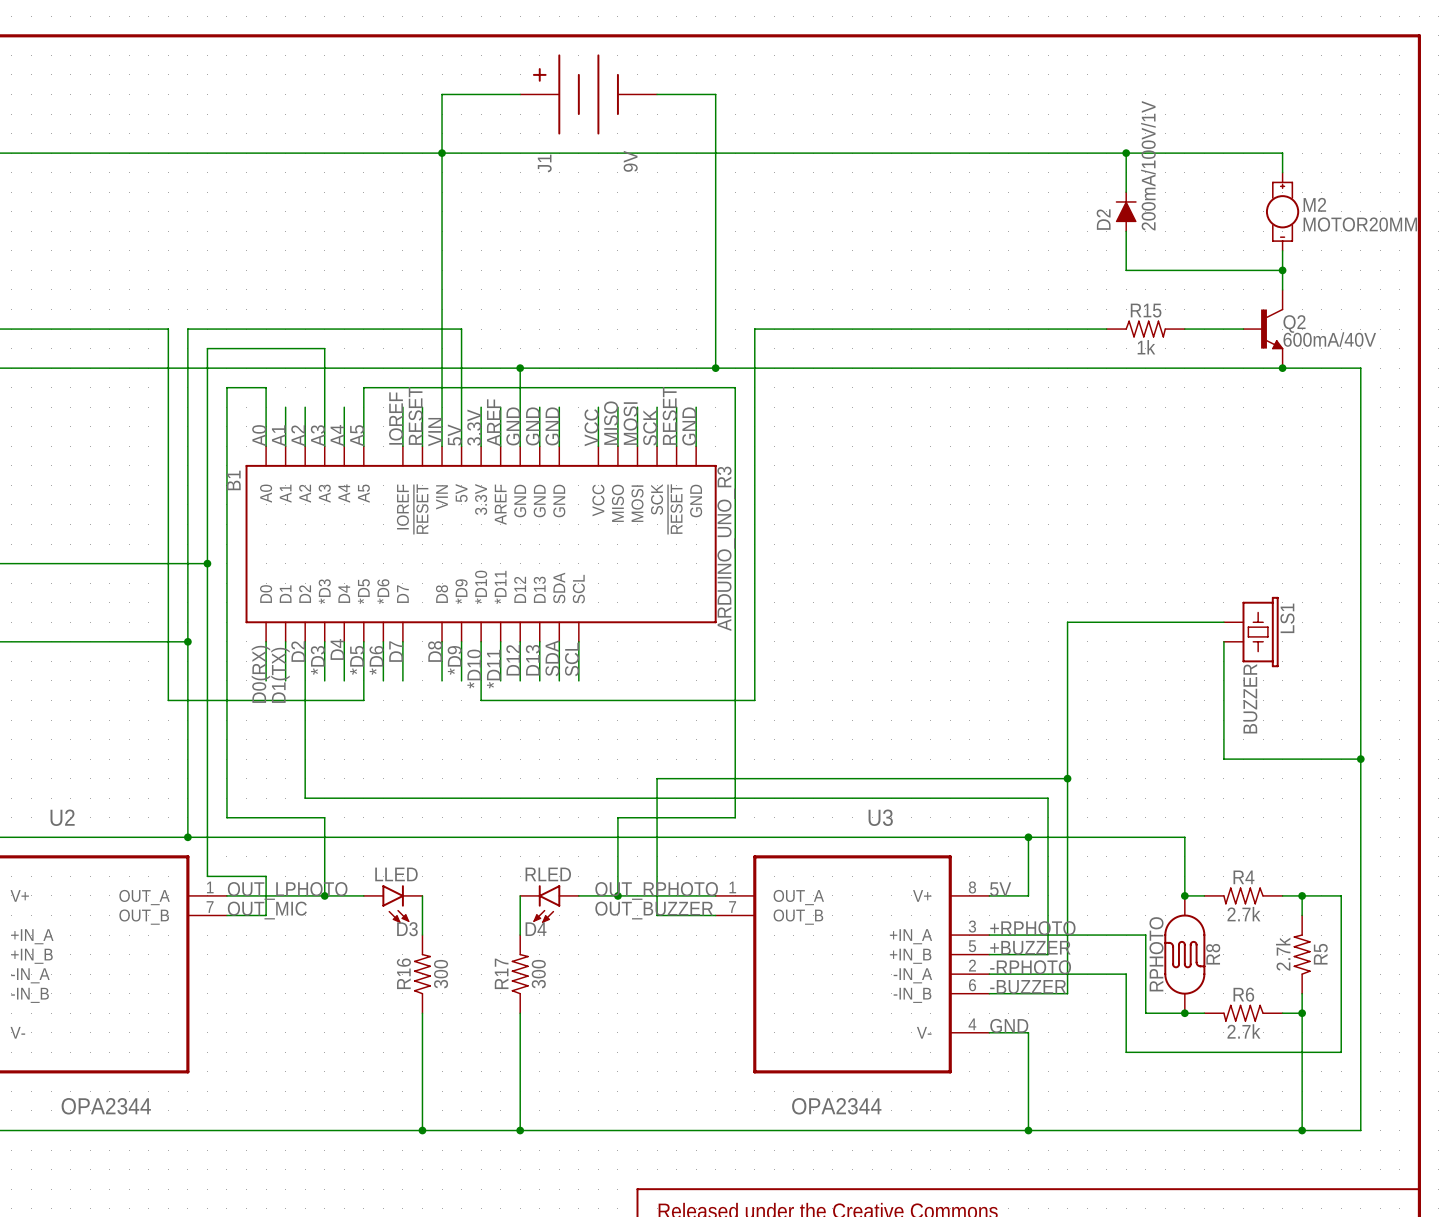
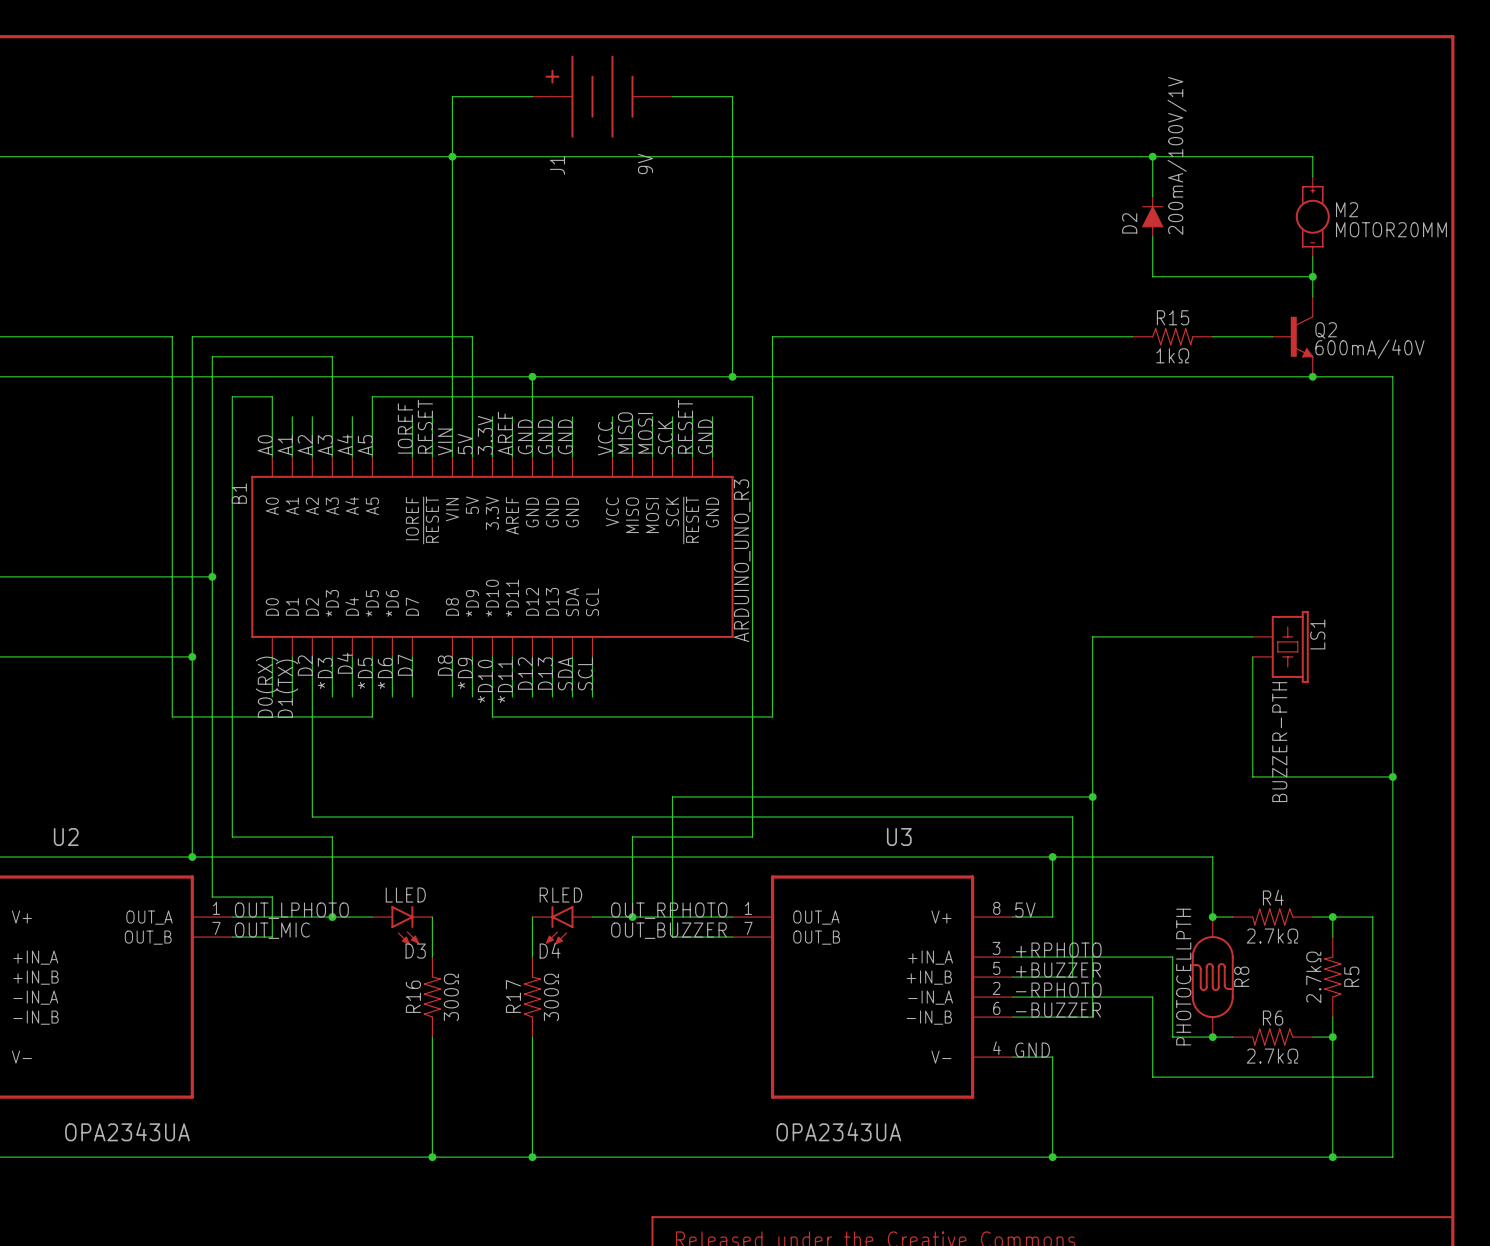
R15 value: 1k (1146, 347) -> 1kΩ (1172, 355)
LS1 value: BUZZER (1250, 698) -> BUZZER-PTH (1279, 742)
R4 value: 2.7k (1243, 914) -> 2.7kΩ (1272, 936)
R8 value: RPHOTO (1156, 954) -> PHOTOCELLPTH (1183, 977)
R5 value: 2.7k (1283, 954) -> 2.7kΩ (1313, 977)
R16 value: 300 (441, 974) -> 300Ω (451, 997)
R17 value: 300 (538, 974) -> 300Ω (551, 997)
R6 value: 2.7k (1243, 1031) -> 2.7kΩ (1272, 1056)
U2 value: OPA2344 (106, 1106) -> OPA2343UA (127, 1131)
U3 value: OPA2344 (836, 1106) -> OPA2343UA (838, 1131)

